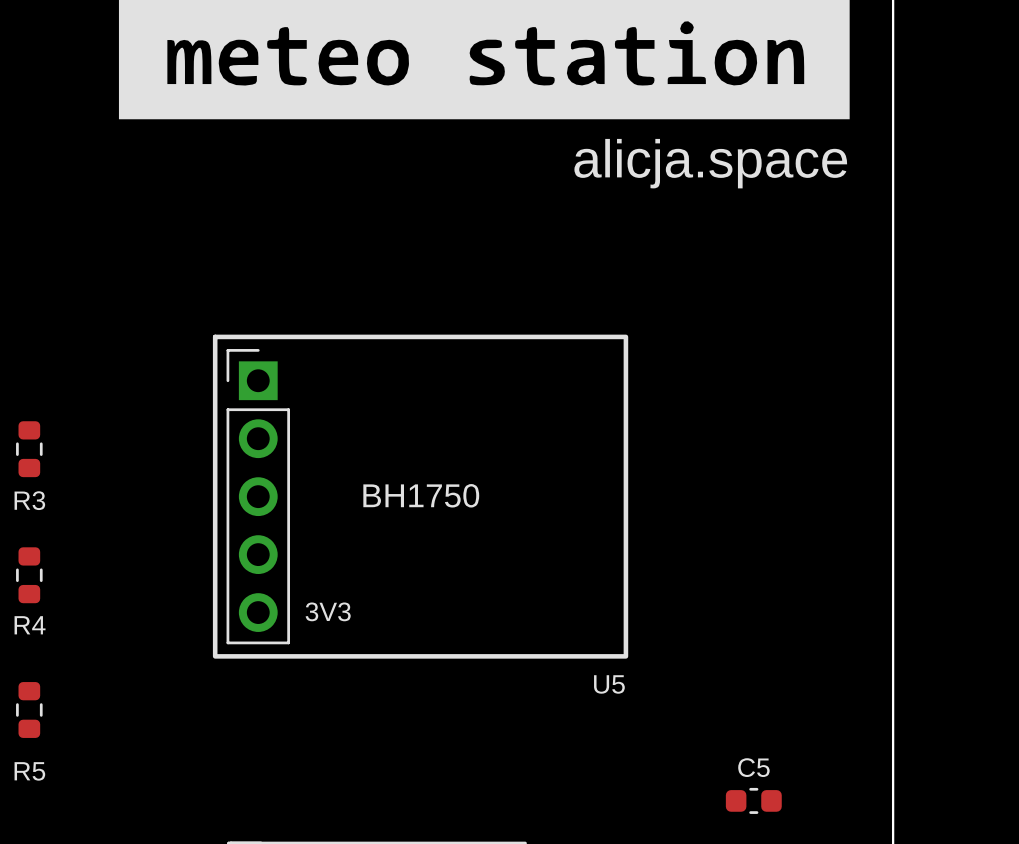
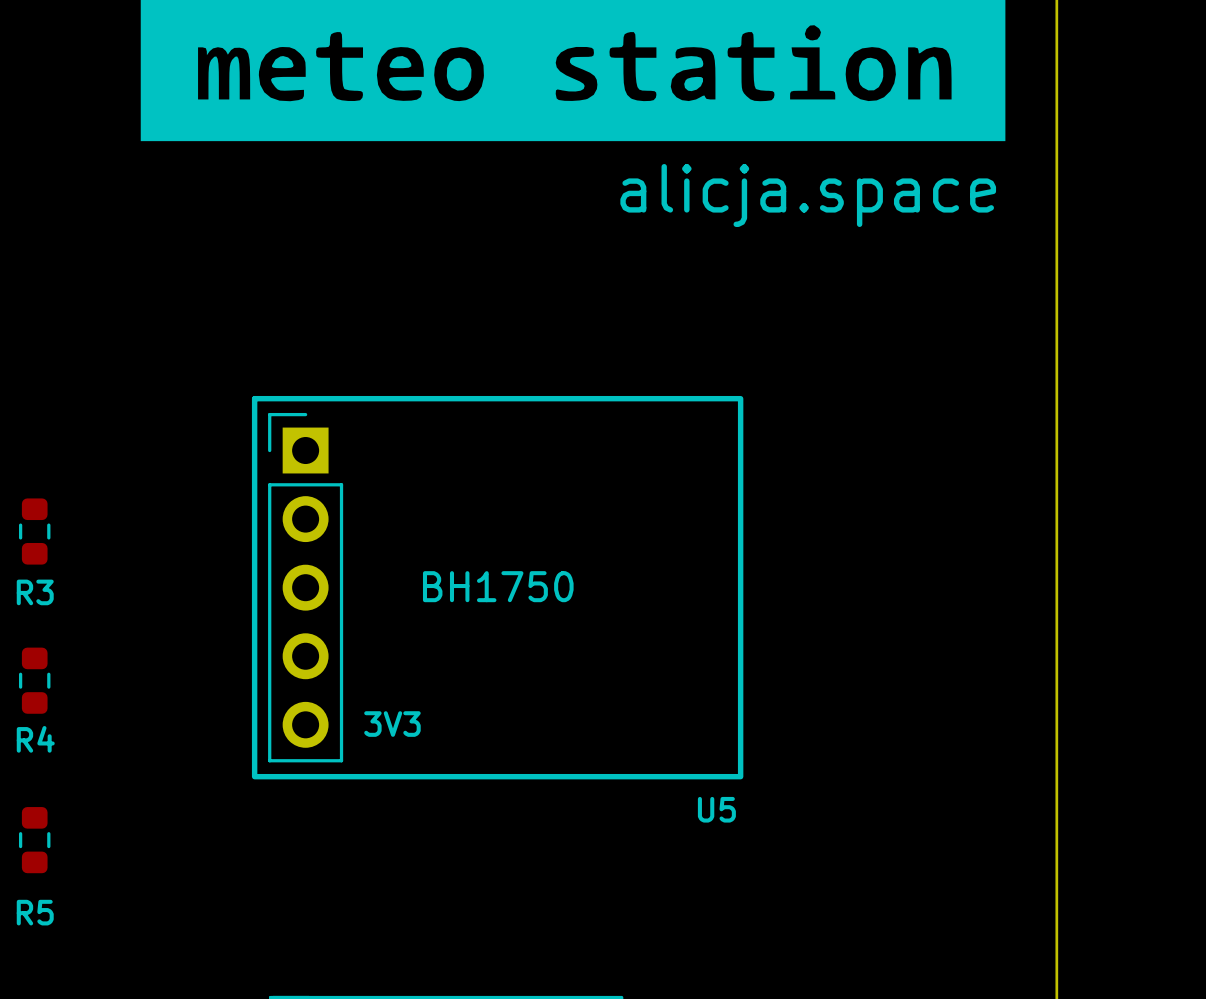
C5: (753, 800) -> none

